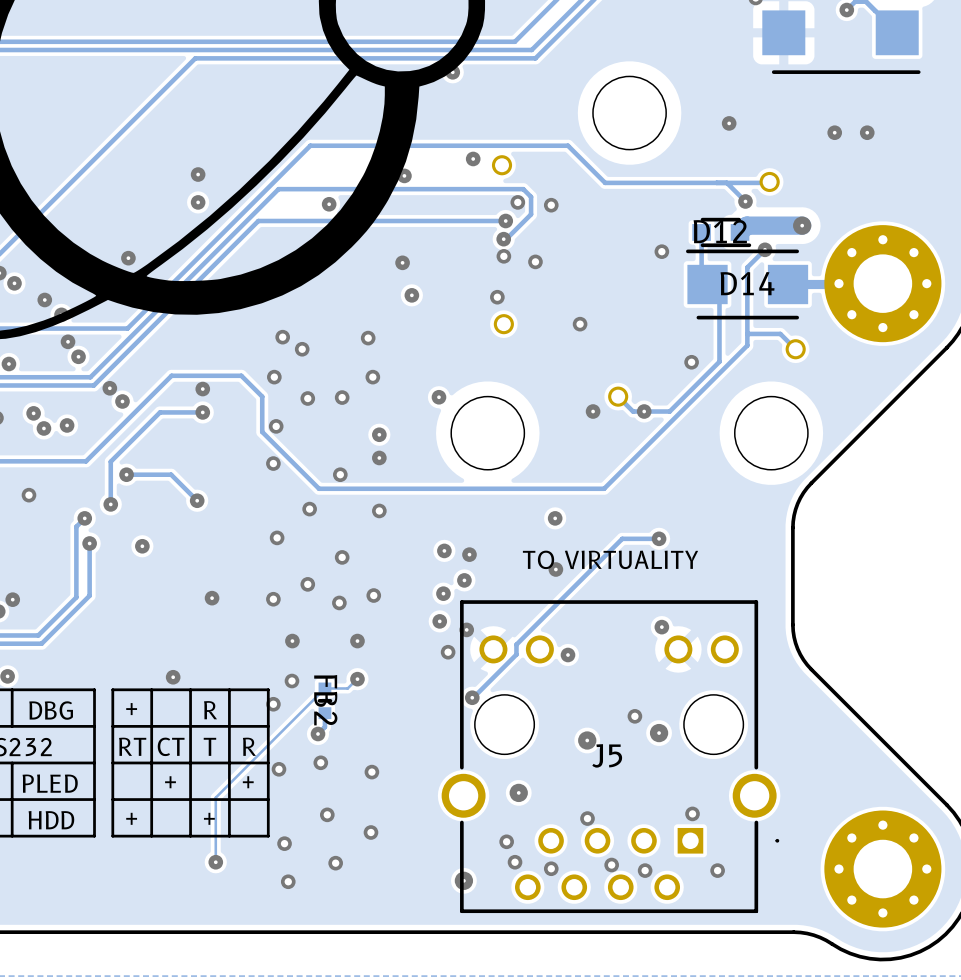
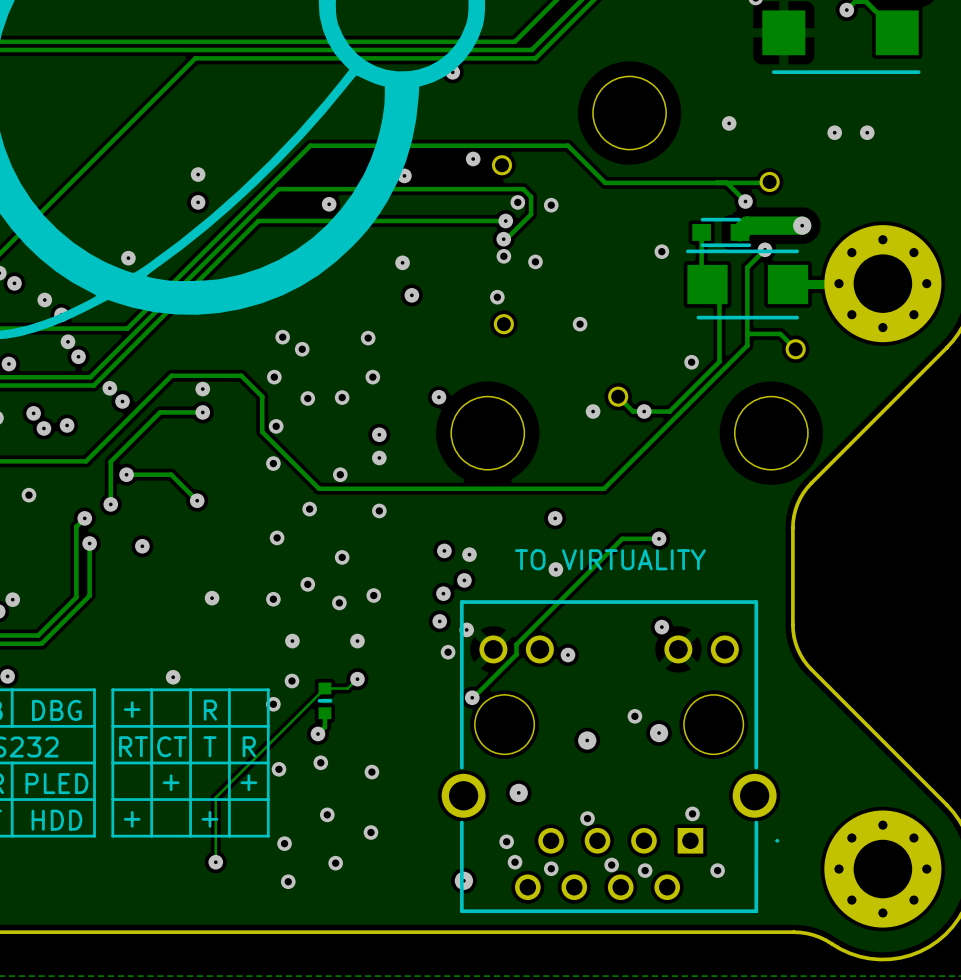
D12 name: D12 (720, 231) -> none
D14 name: D14 (747, 283) -> none
FB2 name: FB2 (325, 700) -> none
J5 name: J5 (607, 755) -> none

